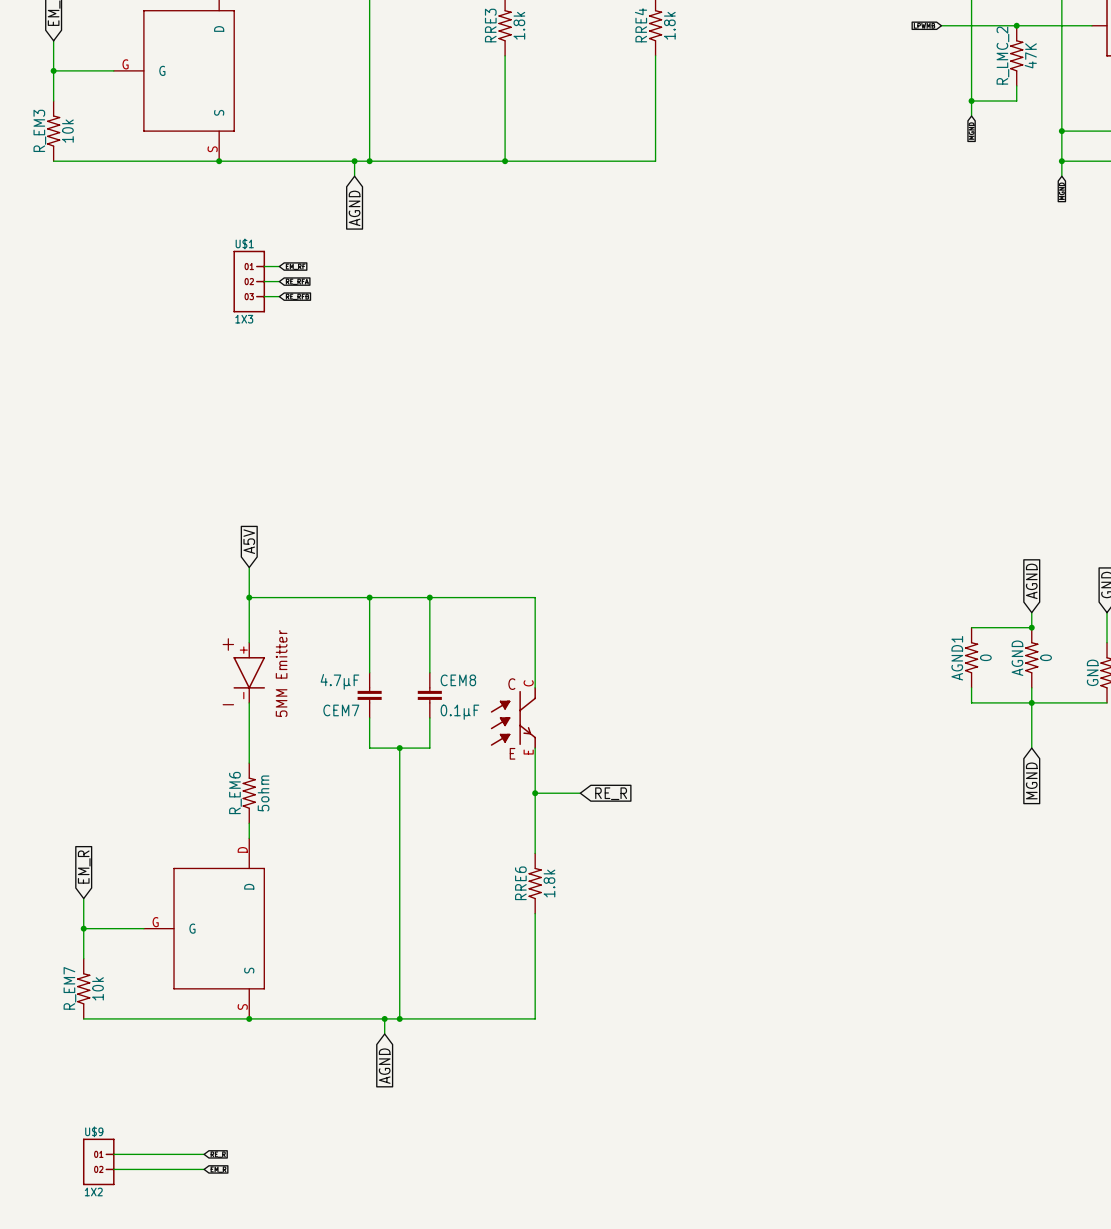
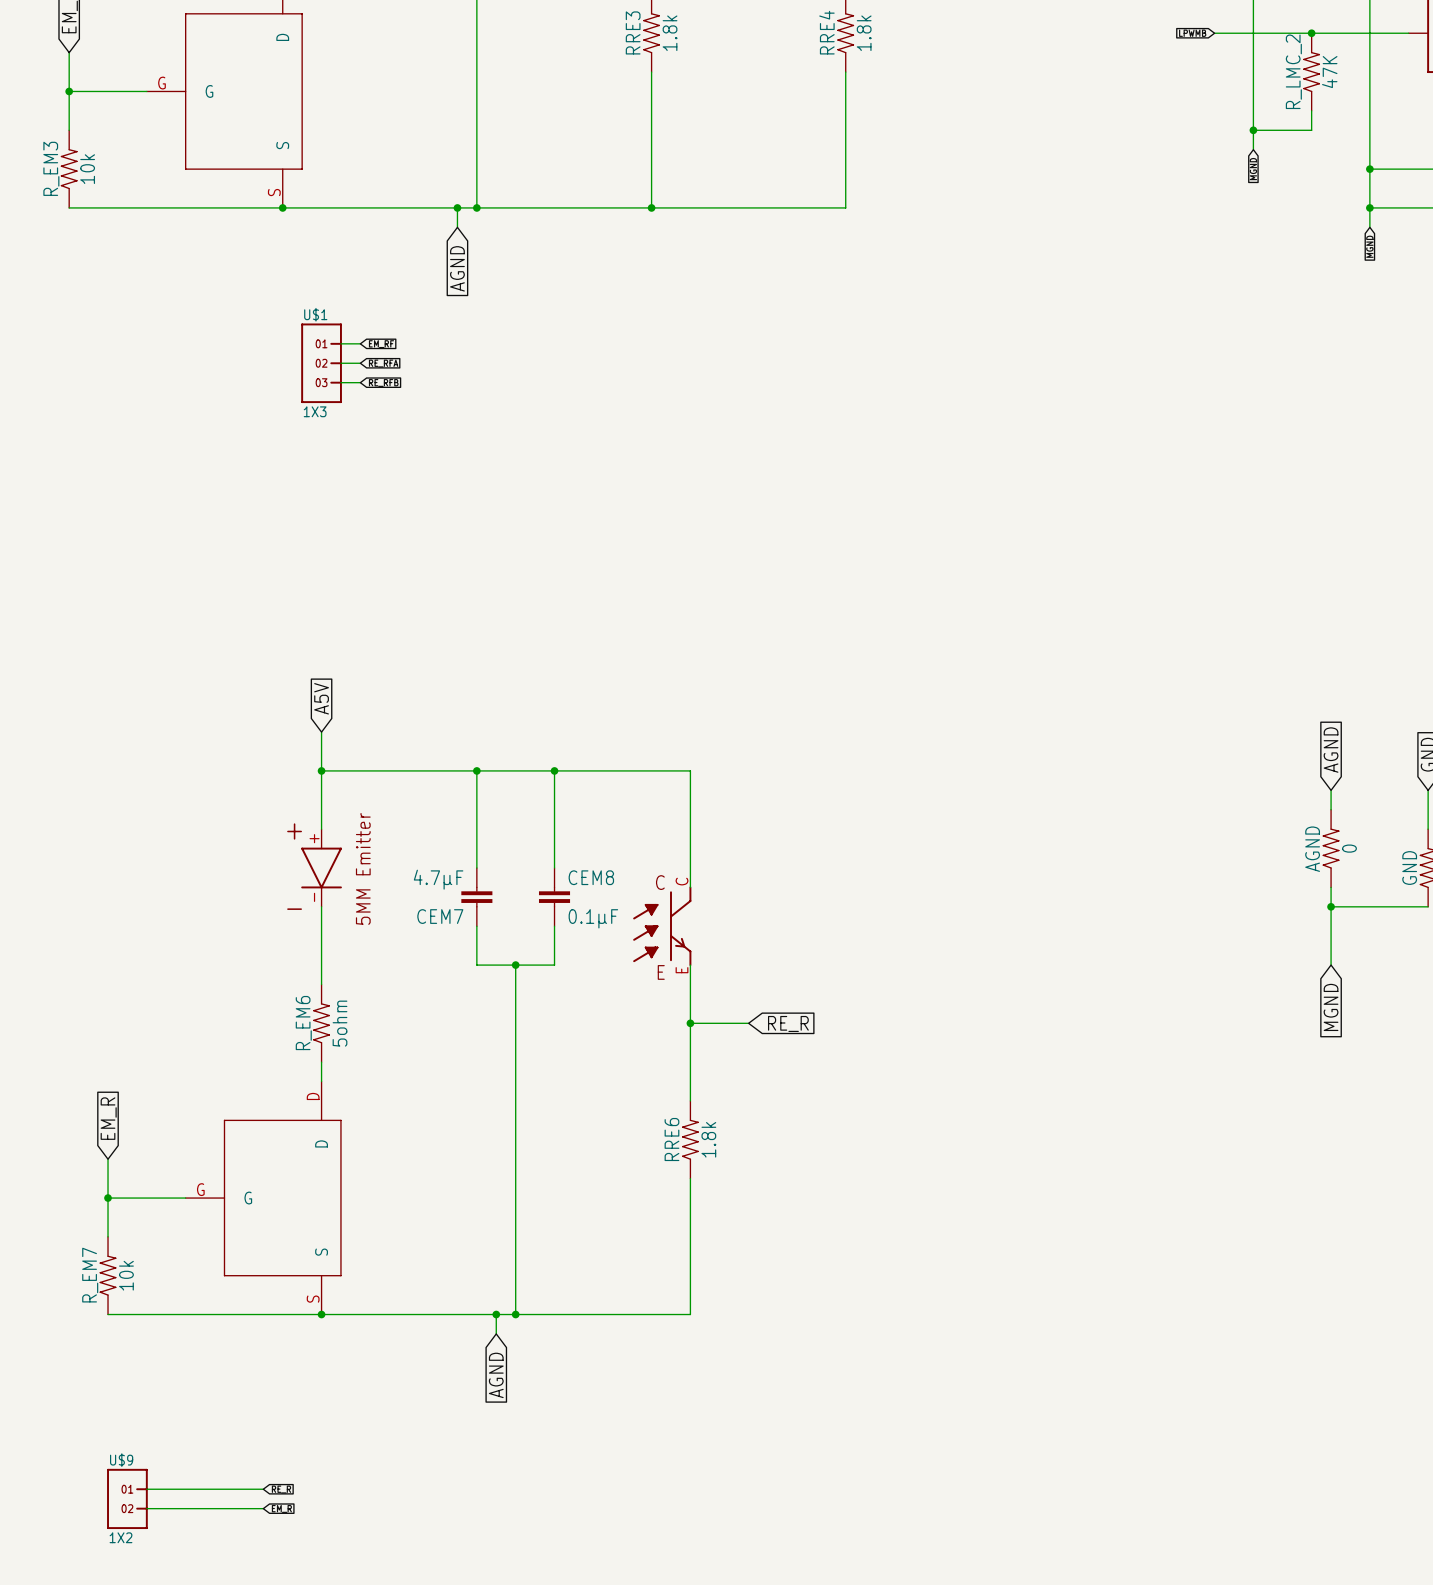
wire: (971, 627) (1031, 627) -> none
junction: (1031, 627) -> none
AGND1: 0 (971, 657) -> none
wire: (971, 687) (971, 702) (1031, 702) -> none

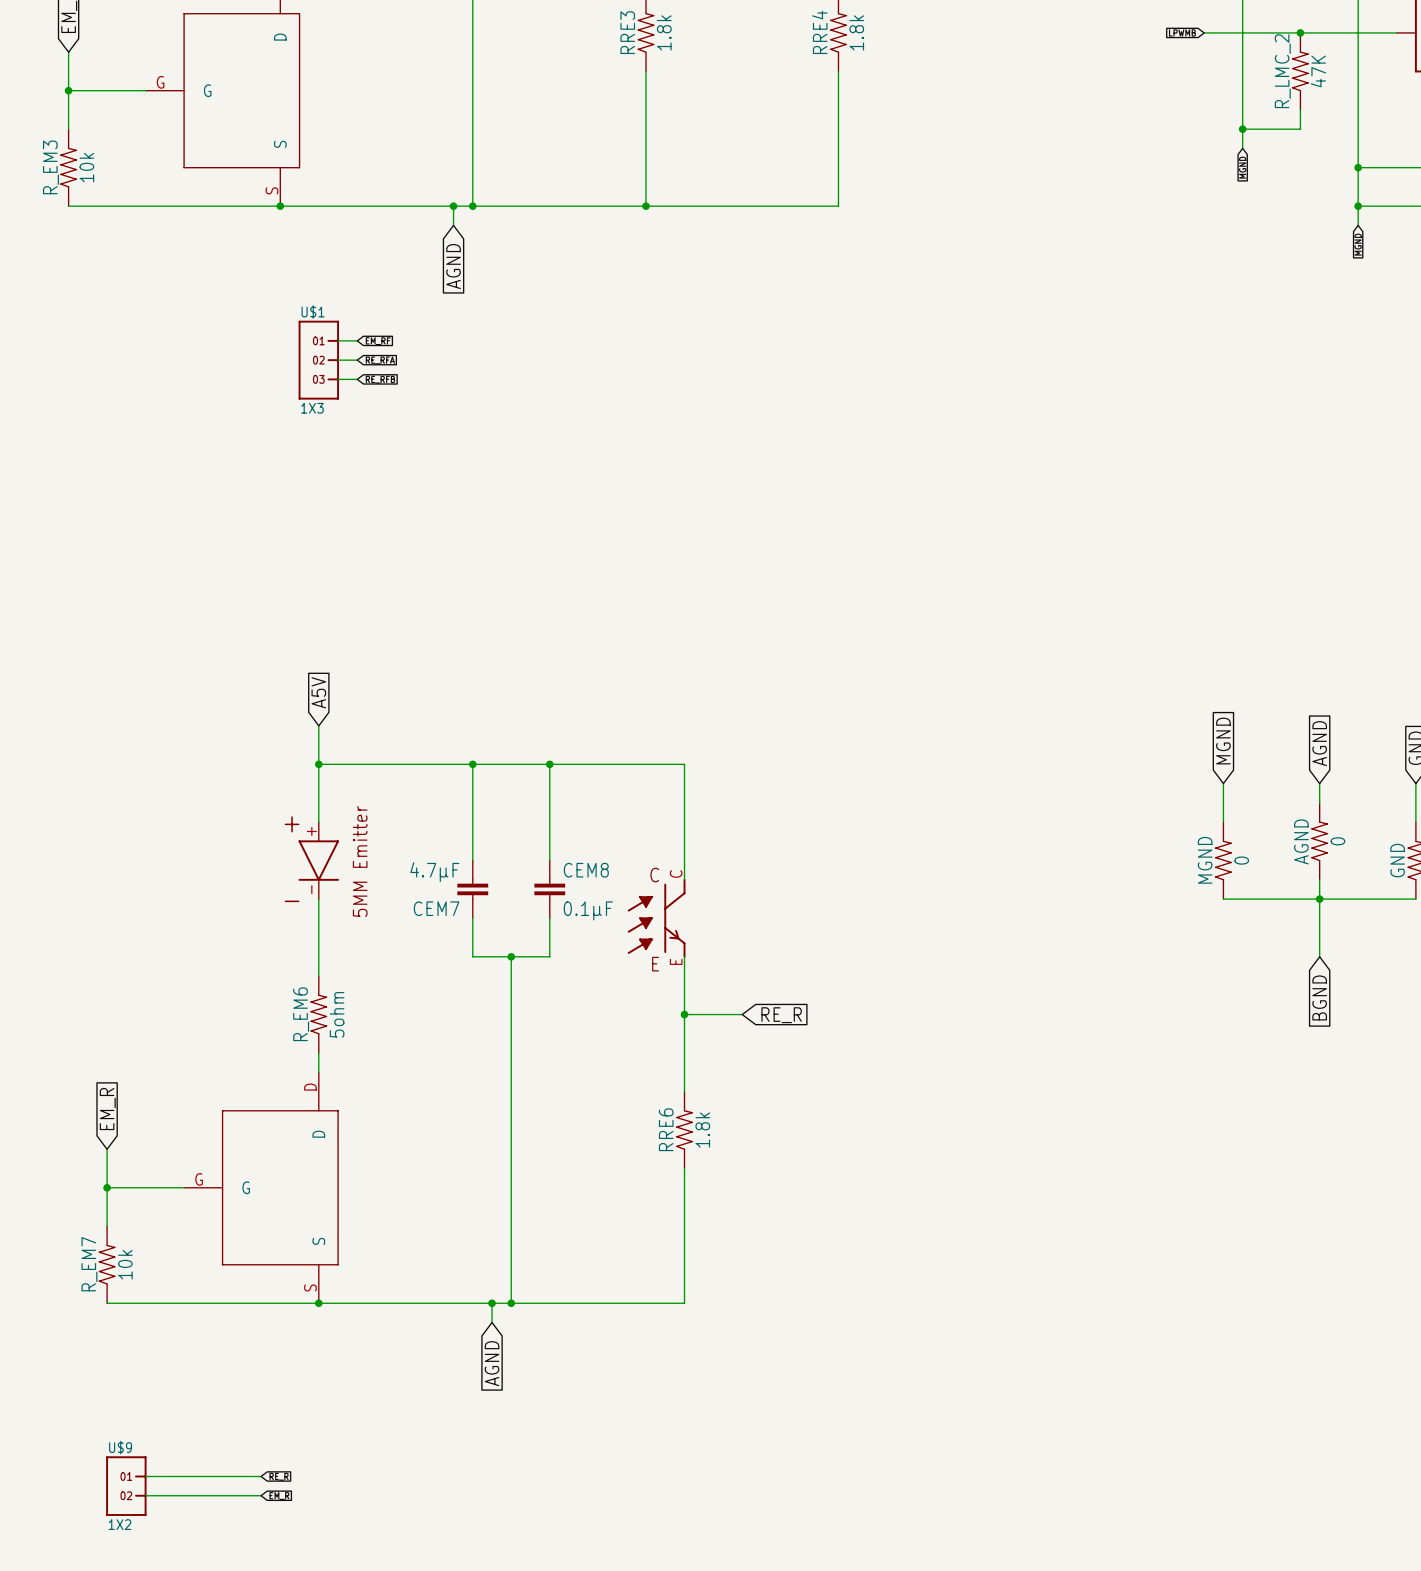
global label: none -> MGND (1223, 741)
wire: none -> (1223, 783) (1223, 822)
MGND: none -> 0 (1223, 860)
wire: none -> (1223, 899) (1319, 899)
global label: MGND (1331, 1007) -> BGND (1319, 997)

